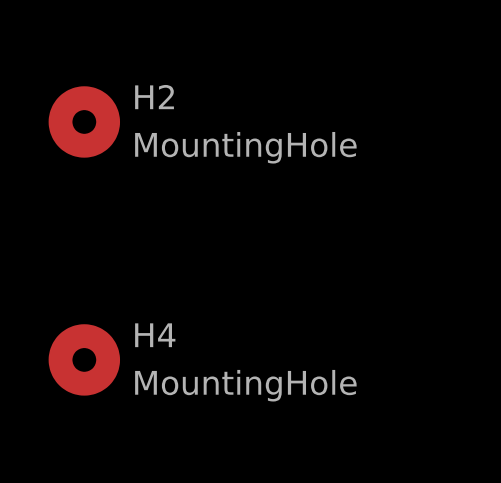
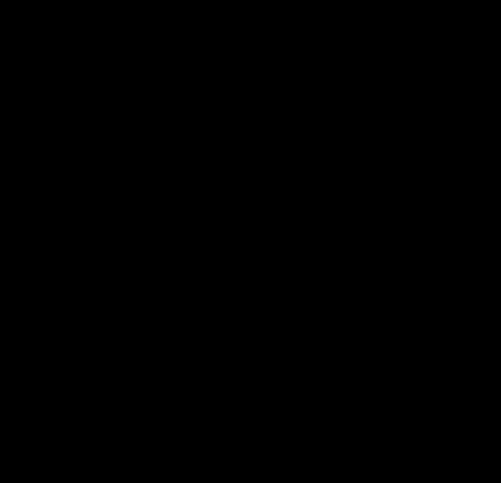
H2: MountingHole (84, 121) -> none
H4: MountingHole (84, 359) -> none

